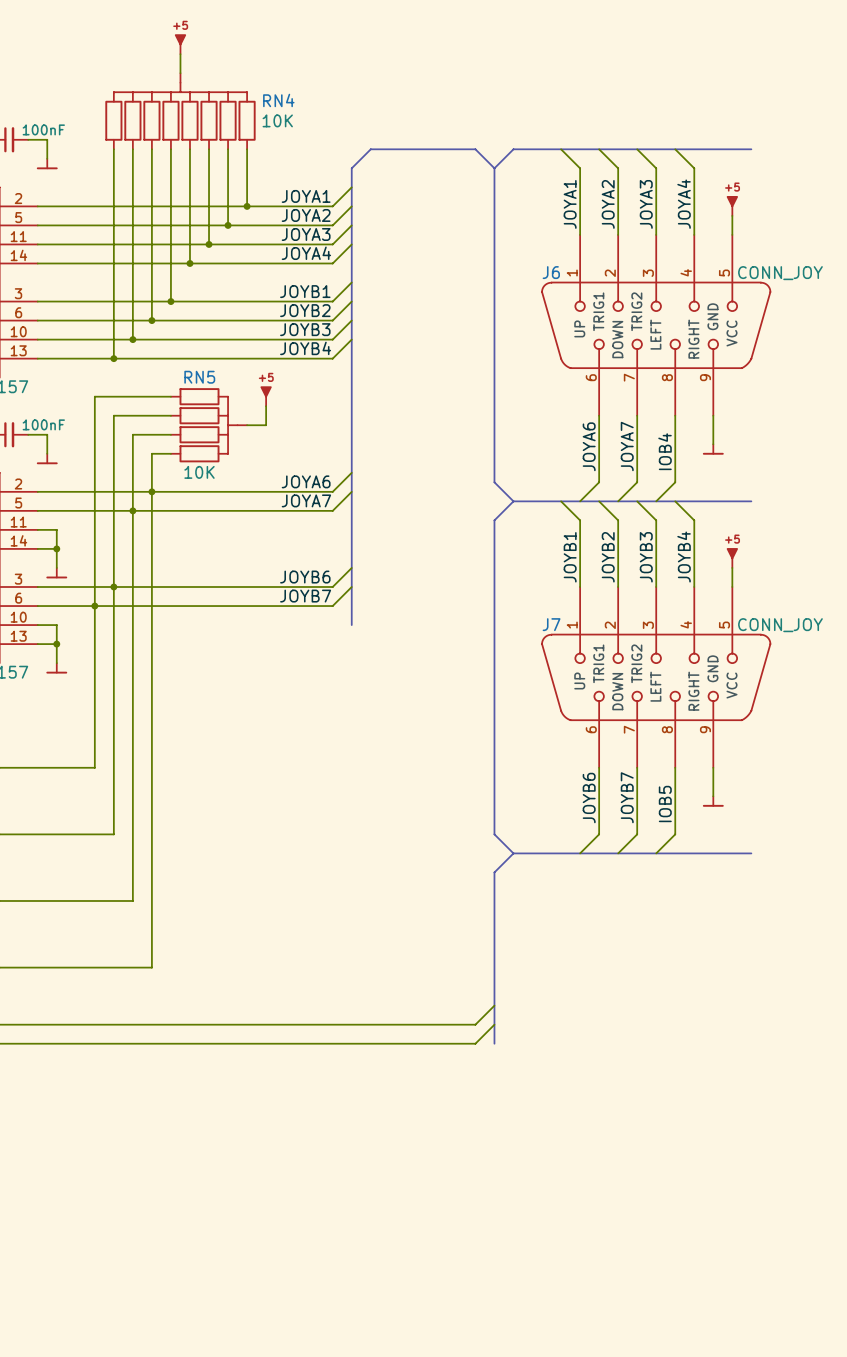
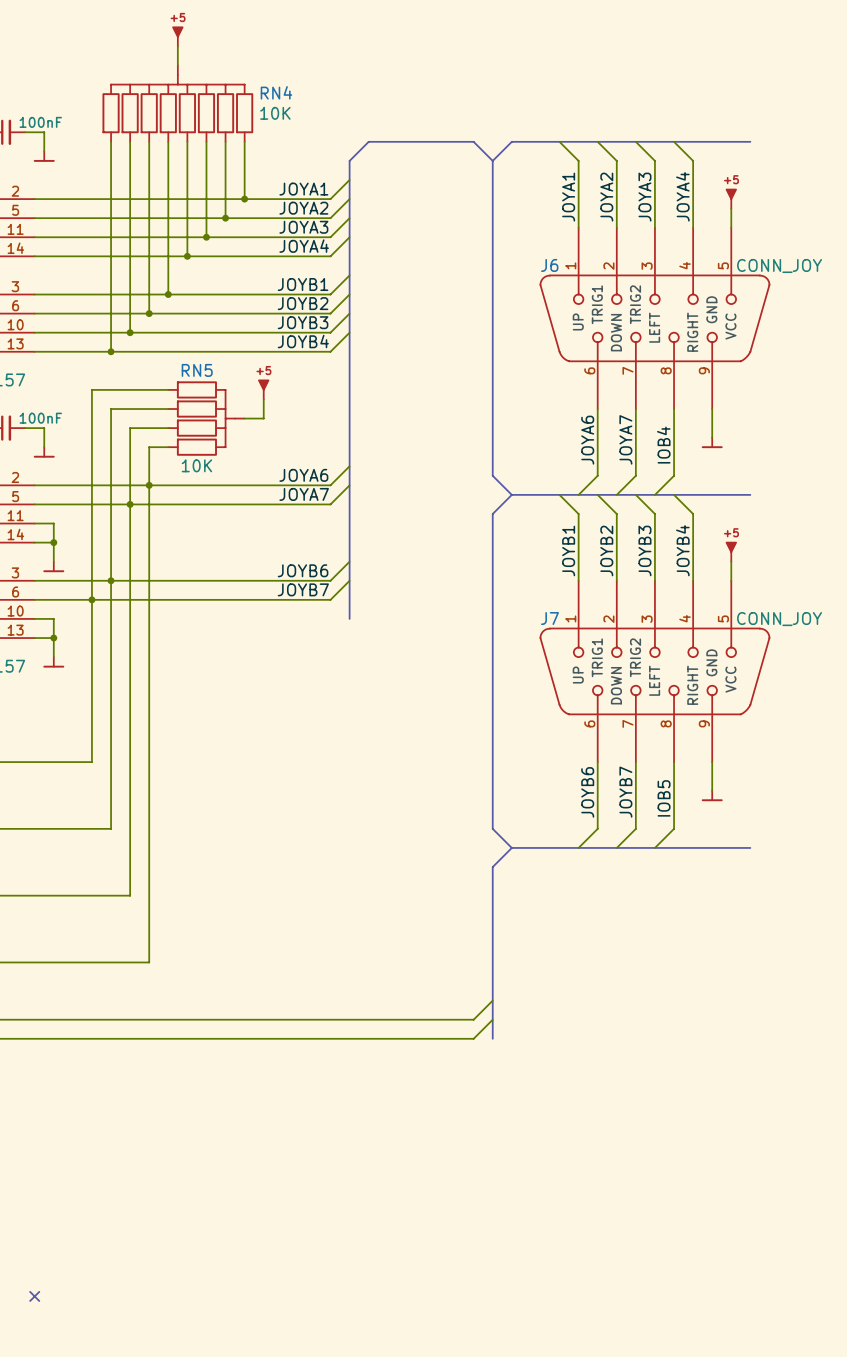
no-connect mark: none -> (34, 1296)

